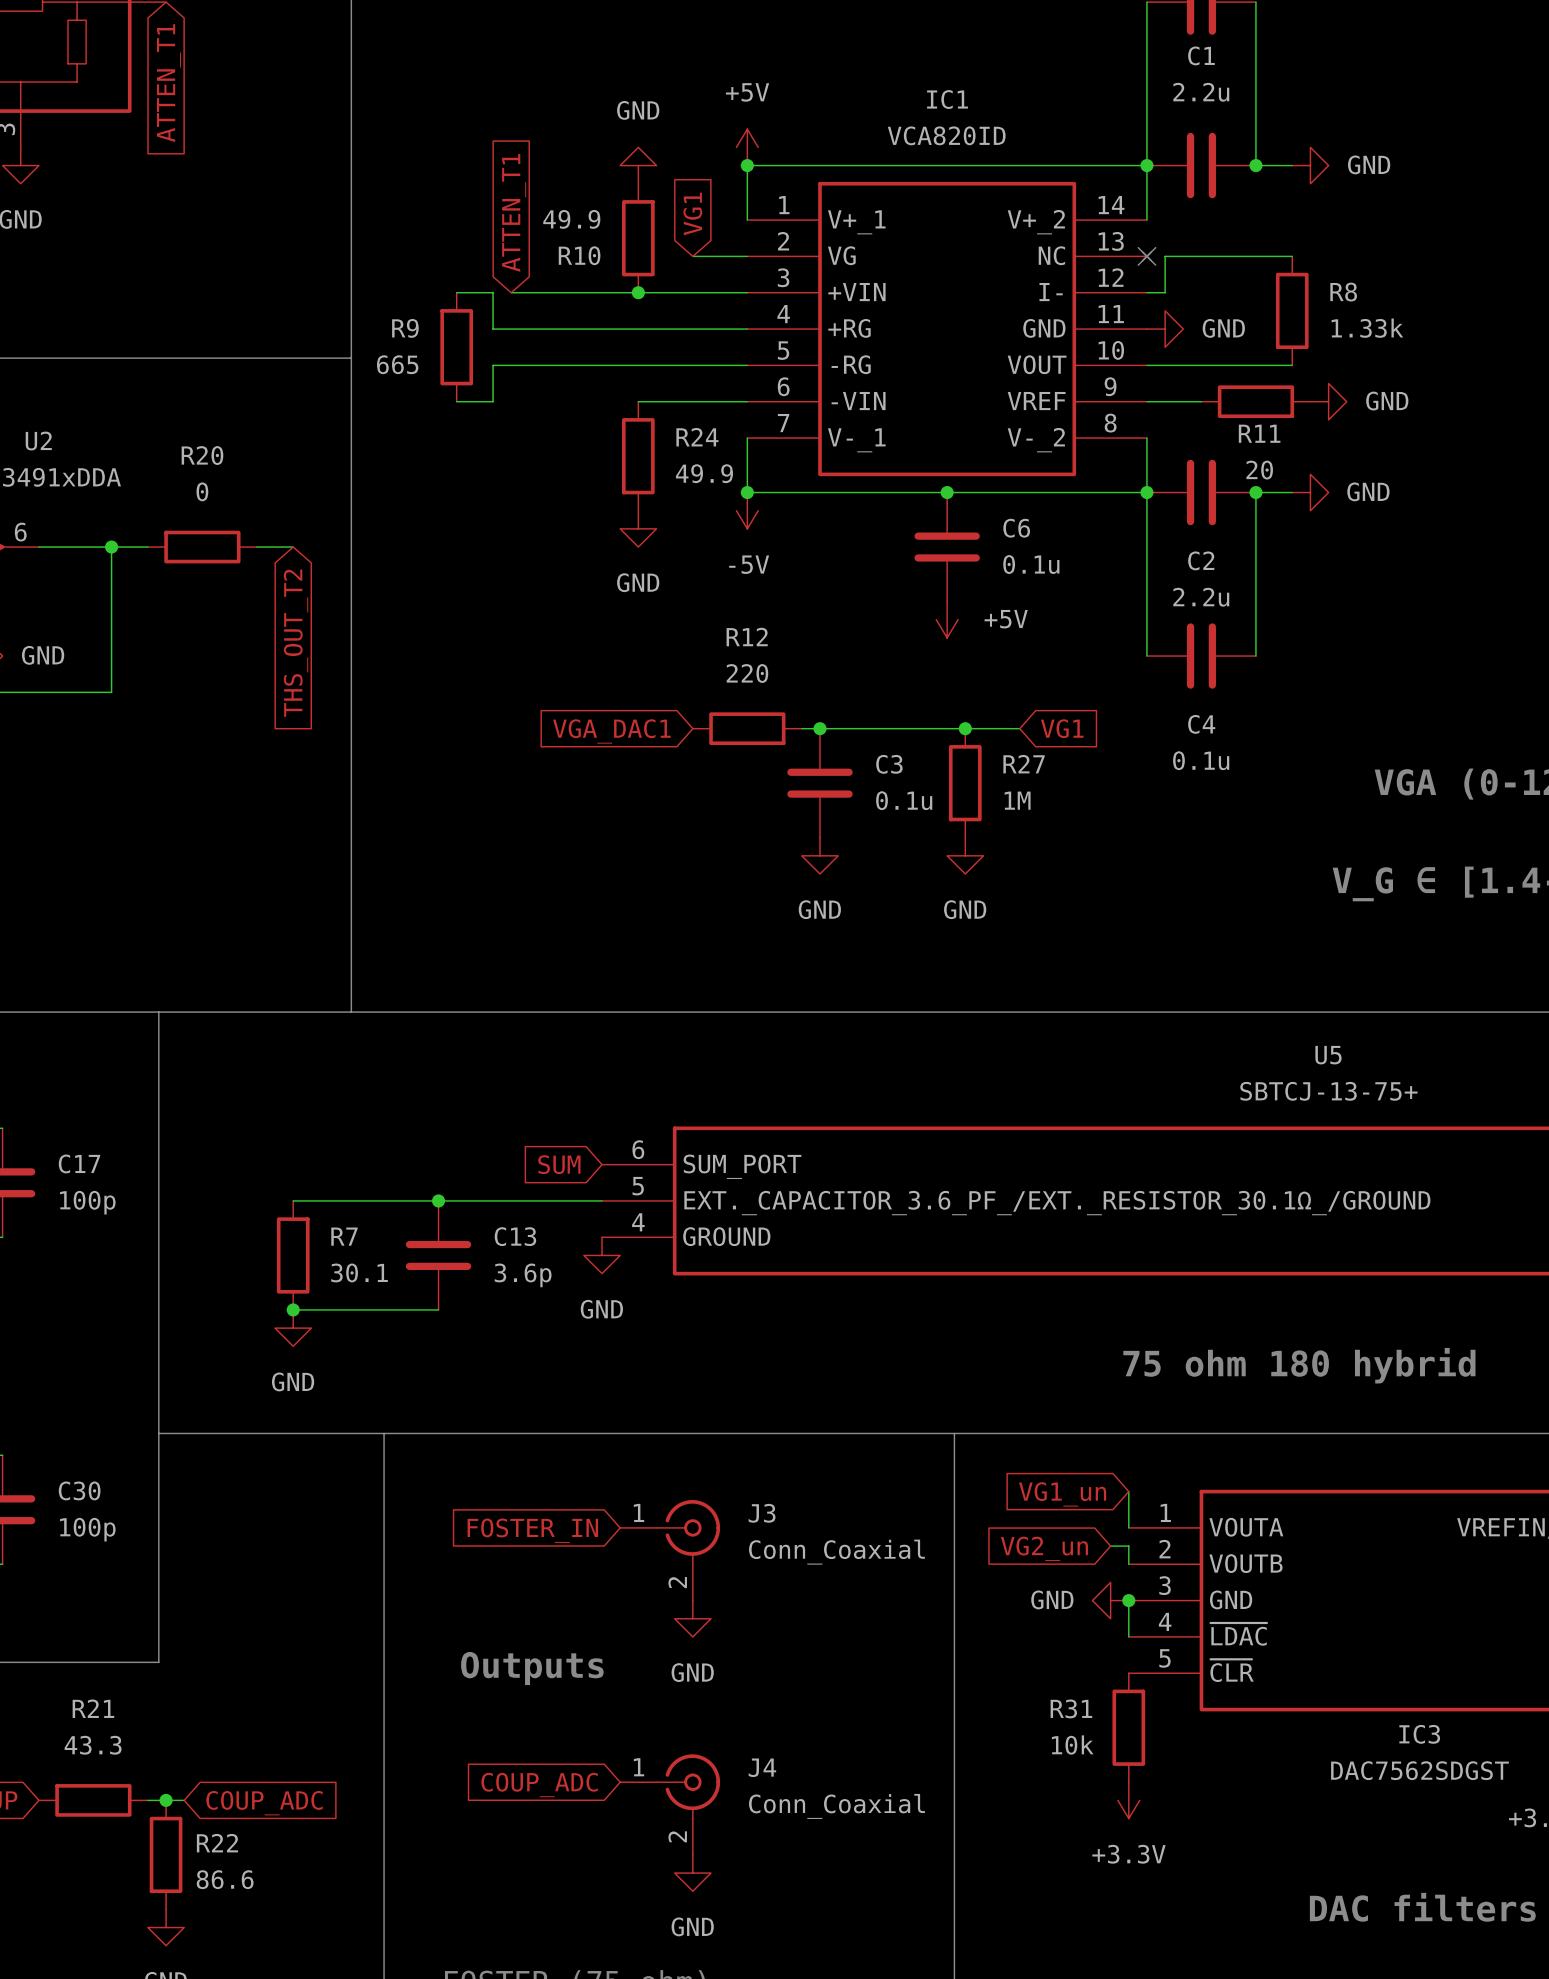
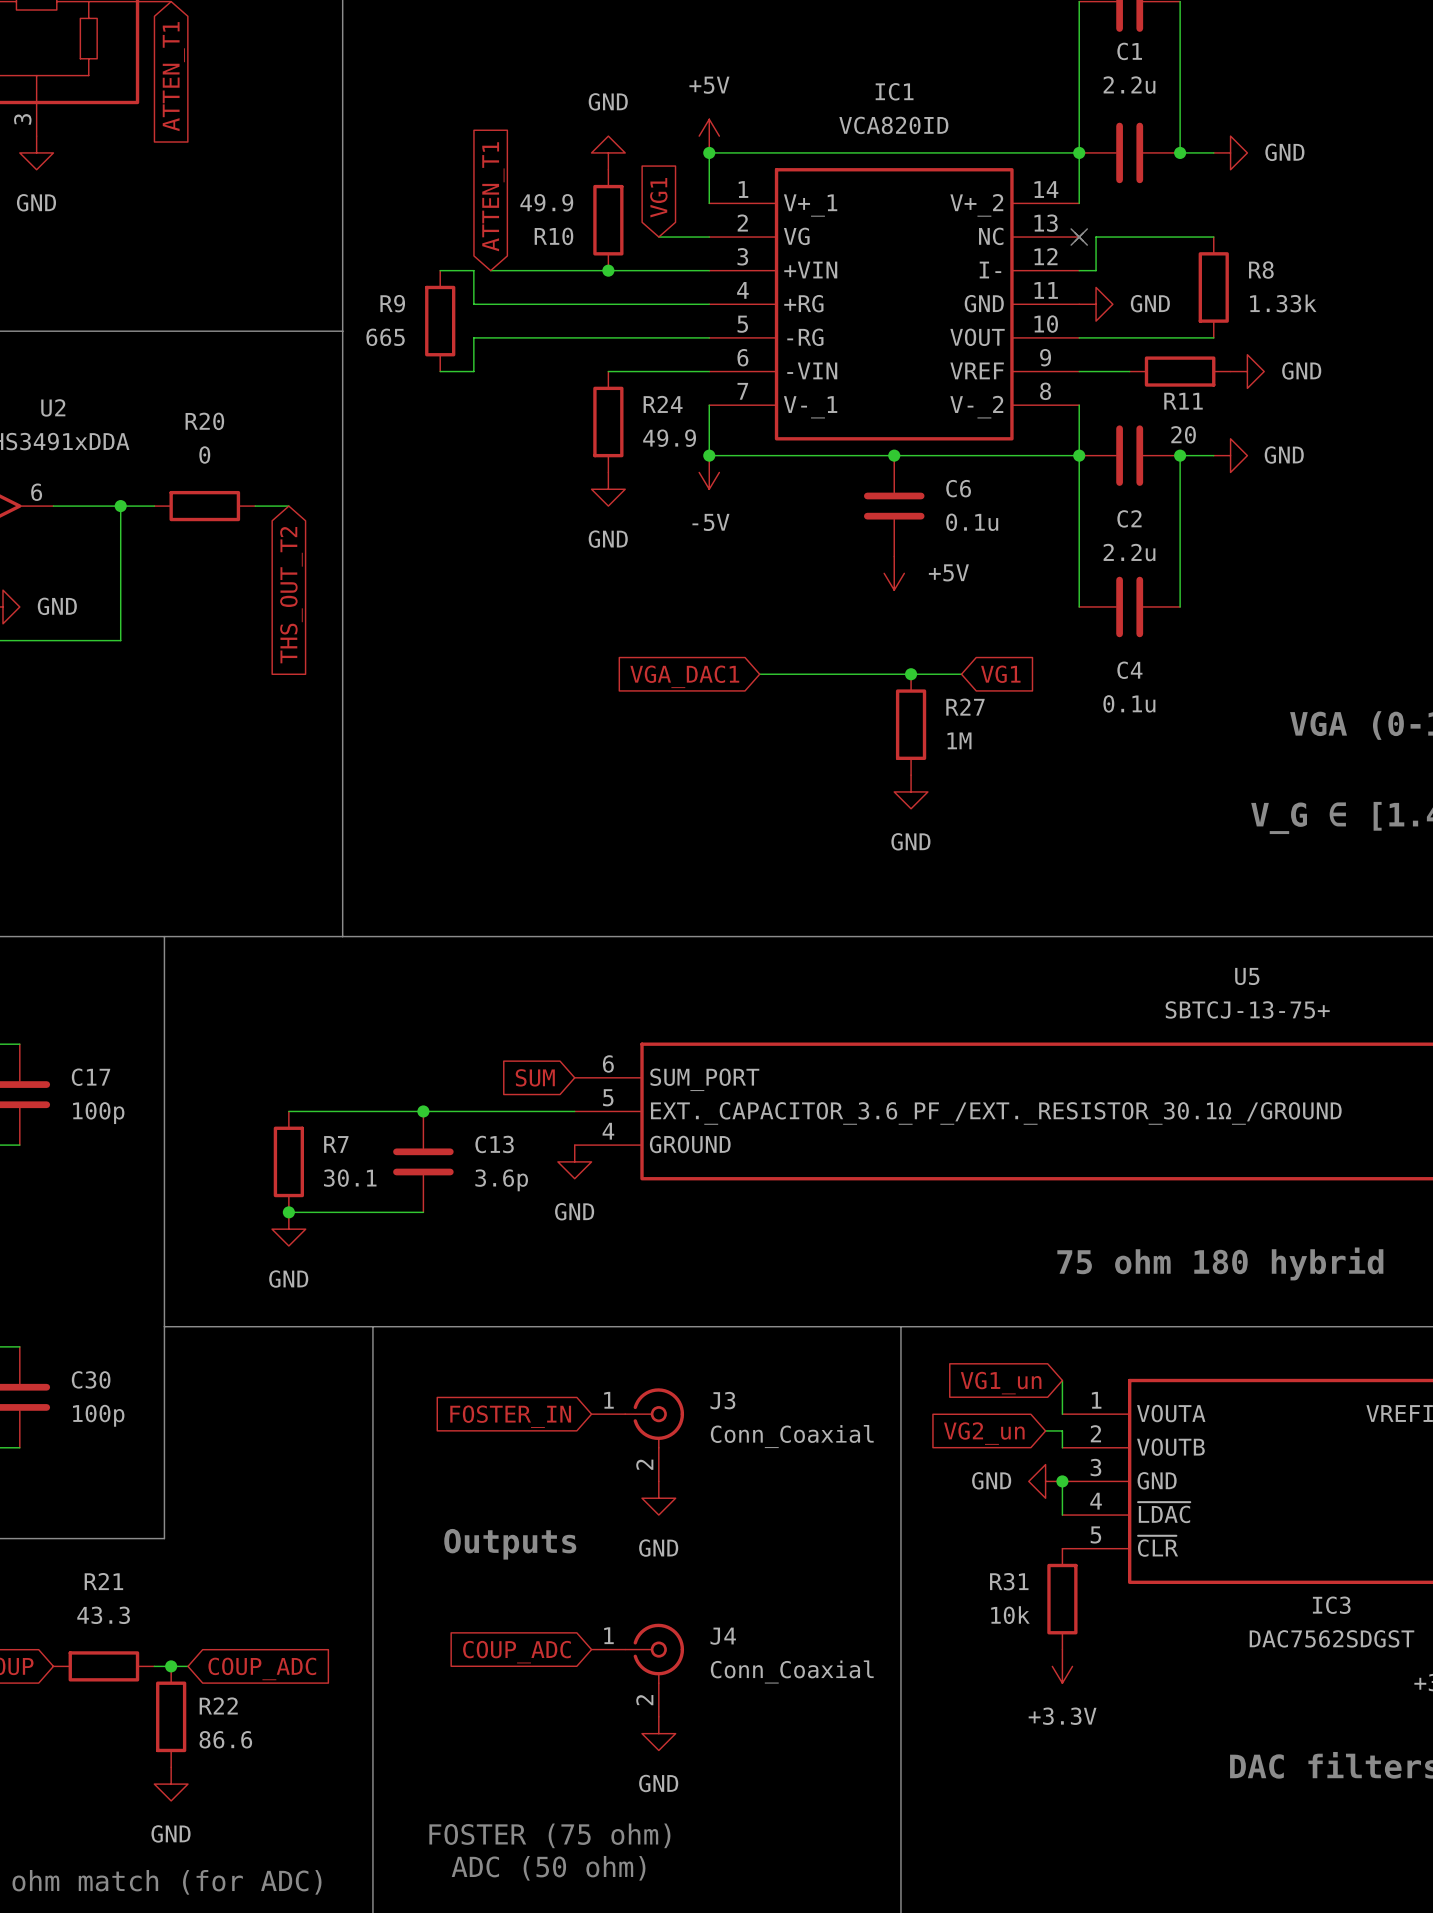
R12: 220 (747, 728) -> none
junction: (820, 728) -> none
global label position: VGA_DAC1 (611, 731) -> VGA_DAC1 (684, 676)
C3: 0.1u (820, 783) -> none
power symbol: GND (820, 855) -> none

